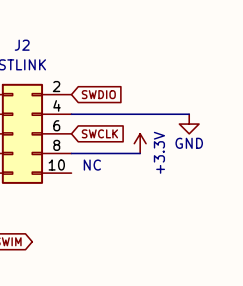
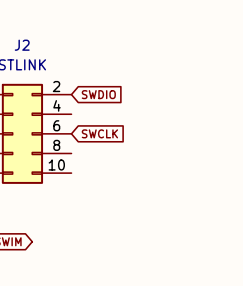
wire: (71, 114) (189, 114) -> none
power symbol: GND (189, 124) -> none
power symbol: +3.3V (140, 143) -> none
wire: (71, 153) (140, 153) -> none
text: NC (92, 165) -> none

